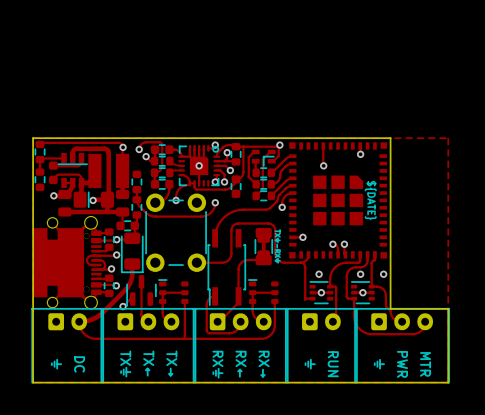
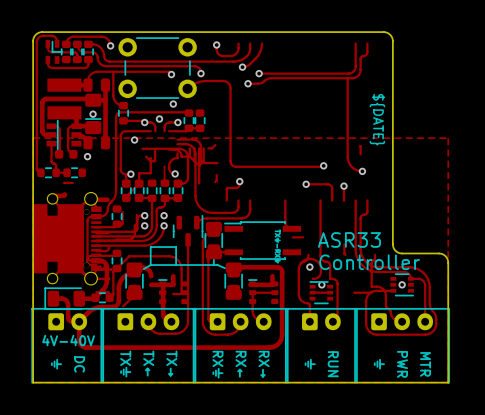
track: none -> (47, 43) (50, 51) (75, 52) (77, 59)
track: none -> (57, 43) (56, 38) (52, 35) (41, 36) (36, 41) (36, 168) (40, 172)
track: none -> (238, 43) (237, 52) (230, 56) (219, 54) (216, 45)
track: none -> (250, 43) (250, 50) (247, 56) (233, 61) (108, 61) (104, 58) (99, 46) (88, 44)
track: none -> (261, 43) (257, 56) (249, 64) (242, 67)
track: none -> (355, 43) (355, 67) (350, 73) (259, 73)
track: none -> (367, 43) (367, 53) (360, 58) (359, 73) (354, 77) (270, 78) (260, 83) (248, 83)
track: none -> (66, 44) (67, 39) (72, 36) (101, 36) (107, 39) (110, 45)
track: none -> (77, 44) (82, 51) (95, 53) (99, 62) (104, 65) (195, 66) (199, 68) (201, 73)
via: none -> (110, 45)
via: none -> (216, 45)
part: none -> (53, 51)
part: none -> (66, 51)
part: none -> (77, 51)
part: none -> (88, 51)
track: none -> (88, 59) (88, 65) (84, 68) (51, 67) (48, 65) (47, 59)
via: none -> (242, 67)
track: none -> (113, 71) (113, 98) (117, 103) (123, 105)
via: none -> (201, 73)
via: none -> (259, 73)
track: none -> (171, 74) (168, 71) (96, 71) (89, 76) (87, 85)
via: none -> (171, 74)
track: none -> (347, 78) (347, 158) (353, 168) (362, 171)
via: none -> (248, 83)
track: none -> (187, 88) (202, 81) (224, 81) (229, 84) (230, 161) (233, 166) (325, 166)
via: none -> (173, 104)
part: none -> (123, 113)
track: none -> (189, 113) (120, 112) (116, 114) (115, 194) (105, 214) (90, 216) (87, 220) (87, 257) (90, 260) (101, 261) (105, 263) (106, 283) (94, 298) (79, 298)
via: none -> (93, 114)
via: none -> (159, 119)
text: none -> ${DATE} (377, 119)
track: none -> (123, 120) (151, 122) (155, 125) (155, 131)
part: none -> (189, 120)
part: none -> (200, 120)
via: none -> (144, 122)
track: none -> (177, 122) (166, 123) (164, 131)
via: none -> (177, 122)
track: none -> (200, 128) (189, 128) (186, 131) (169, 131)
track: none -> (150, 131) (125, 131) (121, 134) (120, 170) (126, 174) (126, 183)
board edge: (33, 138) (390, 138) (390, 308) (448, 308) -> (33, 138) (33, 40) (39, 32) (386, 32) (391, 36) (392, 41) (393, 246) (400, 253) (440, 253) (446, 256) (448, 262) (448, 308)
track: none -> (177, 139) (197, 140) (200, 145) (202, 161) (217, 163)
via: none -> (134, 140)
track: none -> (51, 143) (51, 161) (56, 165) (56, 172) (67, 172)
track: (40, 144) (41, 142) (119, 142) (123, 146) (122, 170) -> none
track: none -> (177, 144) (189, 144) (194, 150) (195, 197) (200, 207) (210, 212) (233, 212) (238, 209) (238, 200)
via: (215, 145) -> none
track: (279, 145) (278, 155) (271, 161) -> none
via: (279, 145) -> none
track: (243, 146) (243, 173) (229, 188) (196, 189) (194, 183) (189, 183) -> none
track: (278, 146) (229, 145) (222, 147) -> none
track: (323, 146) (323, 165) -> none
via: (123, 147) -> none
track: (222, 147) (216, 156) -> none
track: none -> (142, 148) (179, 148) (185, 151) (188, 156) (187, 179) (184, 183) (177, 183)
track: (139, 149) (140, 145) (144, 142) (161, 143) (162, 166) (160, 170) (154, 172) (155, 184) -> none
via: (139, 149) -> none
part: (162, 149) -> none
part: (40, 152) -> none
track: (227, 152) (227, 158) (224, 161) -> none
via: (227, 152) -> none
track: (255, 152) (248, 157) (248, 176) (256, 184) -> none
track: (271, 152) (262, 159) (262, 189) (256, 195) -> none
track: none -> (177, 153) (177, 158) (172, 159) (169, 165) (170, 171) (175, 173)
part: (236, 154) -> none
via position: (360, 154) -> (362, 171)
via: none -> (87, 156)
via: (146, 156) -> none
track: (292, 156) (286, 158) (271, 172) -> none
track: (64, 158) (41, 158) (40, 172) -> none
track: none -> (150, 158) (150, 172) (139, 173) (139, 183) (126, 197)
part: (263, 158) -> none
part: (162, 161) -> none
track: (169, 161) (181, 165) -> none
track: (216, 161) (236, 161) -> none
track: (255, 161) (256, 172) -> none
track: (292, 163) (285, 166) (281, 171) (278, 180) (271, 184) -> none
part: (199, 165) -> none
via: (199, 165) -> none
track: (216, 165) (225, 165) (230, 170) -> none
track: none -> (164, 166) (165, 183)
track: (181, 170) (169, 172) -> none
track: (216, 170) (220, 170) (224, 174) (224, 181) -> none
via: (230, 170) -> none
part: none -> (74, 172)
part: (162, 172) -> none
part: (263, 172) -> none
via: none -> (175, 173)
via: none -> (130, 174)
track: (181, 175) (187, 177) (189, 183) -> none
track: (292, 178) (287, 180) (271, 195) -> none
part rotation: 0° (40, 179) -> 90° clockwise (48, 172)
part rotation: 0° (89, 181) -> 90° counterclockwise (75, 118)
part position: (89, 181) -> (75, 118)
part: (136, 181) -> none
via: (215, 181) -> none
via: (224, 181) -> none
track: none -> (239, 181) (237, 187) (226, 188) (226, 200)
via: none -> (239, 181)
track: (189, 183) (178, 189) (176, 200) -> none
part: (162, 184) -> none
track: (169, 184) (166, 197) (155, 202) -> none
part: (263, 184) -> none
track: none -> (306, 184) (329, 184) (332, 188) (332, 200)
via: none -> (306, 184)
track: (292, 185) (285, 188) (279, 195) (277, 201) (268, 209) (239, 209) (226, 215) (218, 223) (215, 238) -> none
part: (236, 186) -> none
track: none -> (343, 186) (343, 200)
via: none -> (343, 186)
track: (136, 189) (138, 204) (146, 213) (152, 216) (205, 216) (212, 211) (215, 202) -> none
part: none -> (126, 190)
part: none -> (139, 190)
part: none -> (152, 190)
part: none -> (165, 190)
part: none -> (177, 190)
track: (292, 193) (284, 197) (282, 207) -> none
via: (53, 195) -> none
part: (263, 195) -> none
track: none -> (139, 197) (152, 198) (152, 227) (148, 233) (142, 236) (96, 236)
track: none -> (177, 197) (165, 198) (164, 205) (157, 209) (156, 229) (149, 238) (141, 241) (96, 241)
via: (93, 200) -> none
via: (176, 200) -> none
track: none -> (250, 200) (250, 211) (245, 217) (205, 218) (196, 222)
track: none -> (285, 200) (285, 224) (291, 228)
part: (338, 200) -> none
track: none -> (367, 200) (367, 212) (360, 218) (362, 256) (367, 263) (374, 266) (411, 267) (423, 273) (429, 283) (430, 306) (436, 317) (435, 326) (433, 331) (425, 334) (377, 334) (369, 331) (366, 323) (367, 295) (374, 291) (393, 290)
via: (215, 202) -> none
part: (136, 207) -> none
via: (282, 207) -> none
track: none -> (144, 215) (137, 217) (137, 229) (134, 231) (96, 231)
via: none -> (144, 215)
via: none -> (164, 215)
part: none -> (117, 216)
track: none -> (117, 224) (114, 227) (96, 227)
part: (127, 225) -> none
via: none -> (144, 225)
track: none -> (164, 225) (161, 236) (150, 244) (96, 245)
via: none -> (164, 225)
part footprint: [254, 227, 273, 266] -> [224, 221, 302, 260]
part rotation: 0° (176, 232) -> 90° clockwise (157, 68)
part position: (176, 232) -> (157, 68)
via: (302, 237) -> none
part: (109, 239) -> none
via: (116, 239) -> none
text: none -> ASR33 (349, 239)
part: none -> (213, 240)
track: (332, 244) (337, 247) (338, 254) -> none
via: (332, 244) -> none
via: (344, 244) -> none
part rotation: 0° (132, 252) -> 90° clockwise (64, 298)
part position: (132, 252) -> (64, 298)
via: (116, 254) -> none
track: (360, 254) (359, 262) (340, 263) (331, 272) (330, 286) (336, 287) (336, 318) (332, 321) -> (320, 200) (320, 257) (329, 263) (330, 278) (335, 279) (337, 283) (337, 317) (332, 321)
track: (367, 254) (365, 265) (351, 268) (346, 275) (346, 297) (354, 298) (354, 318) (357, 327) (369, 334) (414, 334) (422, 329) (425, 321) -> (355, 200) (355, 249) (358, 260) (364, 267) (372, 271) (404, 272) (409, 274) (410, 278) (423, 280) (425, 285) (425, 321)
line: none -> (213, 259) (213, 264)
part: none -> (117, 260)
track: (263, 260) (246, 260) (240, 263) (238, 269) (238, 302) (217, 321) -> (233, 252) (215, 252) (208, 258) (208, 319) (210, 321) (217, 321)
part position: (67, 262) -> (67, 238)
track: (196, 262) (223, 262) (228, 260) (231, 254) (231, 229) (234, 224) (270, 223) (275, 229) (276, 258) (282, 262) (303, 264) (305, 299) (312, 298) -> none
text: none -> Controller (369, 262)
track: (132, 264) (131, 280) (125, 290) (98, 316) (89, 320) (79, 321) (80, 329) (87, 336) (96, 338) (264, 338) (270, 334) (274, 328) (274, 301) -> none
line: none -> (176, 264) (176, 247) (150, 247) (150, 265)
line: none -> (150, 265) (143, 269)
line: none -> (150, 265) (217, 265) (224, 268)
track: none -> (134, 267) (146, 268) (151, 276)
part: (226, 267) -> none
track: none -> (233, 267) (277, 267) (281, 269) (282, 336) (275, 345) (269, 347) (85, 347) (79, 342) (79, 321)
via: none -> (309, 267)
via: (111, 268) -> none
track: none -> (134, 272) (126, 275) (120, 281) (118, 301) (116, 305) (94, 308) (79, 321)
via: (319, 274) -> none
via: (360, 274) -> none
via: (383, 274) -> none
track: none -> (173, 276) (173, 284) (151, 284)
track: none -> (272, 276) (272, 284) (250, 284)
track: none -> (312, 278) (320, 275) (320, 266) (315, 260) (306, 259) (299, 267) (298, 294) (301, 300) (309, 304) (309, 321)
part: none -> (134, 281)
track: (141, 281) (141, 315) (144, 320) (148, 321) -> (188, 239) (187, 325) (178, 333) (159, 333) (151, 330) (148, 321)
part: none -> (233, 281)
track: (96, 284) (116, 285) -> none
via: none -> (321, 284)
via: none -> (402, 284)
part: (109, 285) -> none
via: (116, 285) -> none
part rotation: 0° (141, 290) -> 180° (188, 231)
part position: (141, 290) -> (188, 231)
track: (184, 292) (162, 292) (163, 315) (166, 319) (171, 321) -> (163, 284) (163, 315) (166, 320) (171, 321)
via: (321, 292) -> none
part rotation: 0° (362, 292) -> 180° (402, 284)
part position: (362, 292) -> (402, 284)
via: (362, 292) -> none
track: none -> (173, 293) (181, 292) (181, 267) (176, 258) (168, 256) (129, 256) (113, 270) (113, 294) (109, 297)
track: (215, 296) (210, 298) (207, 302) (207, 332) (232, 332) (238, 328) (240, 321) -> (213, 232) (206, 235) (202, 241) (203, 325) (210, 333) (229, 334) (236, 330) (240, 321)
part: none -> (102, 297)
track: none -> (53, 298) (65, 300) (68, 304) (68, 319) (79, 321)
track: (184, 301) (185, 338) -> none
via: (123, 306) -> none
text: none -> 4V-40V (68, 340)

